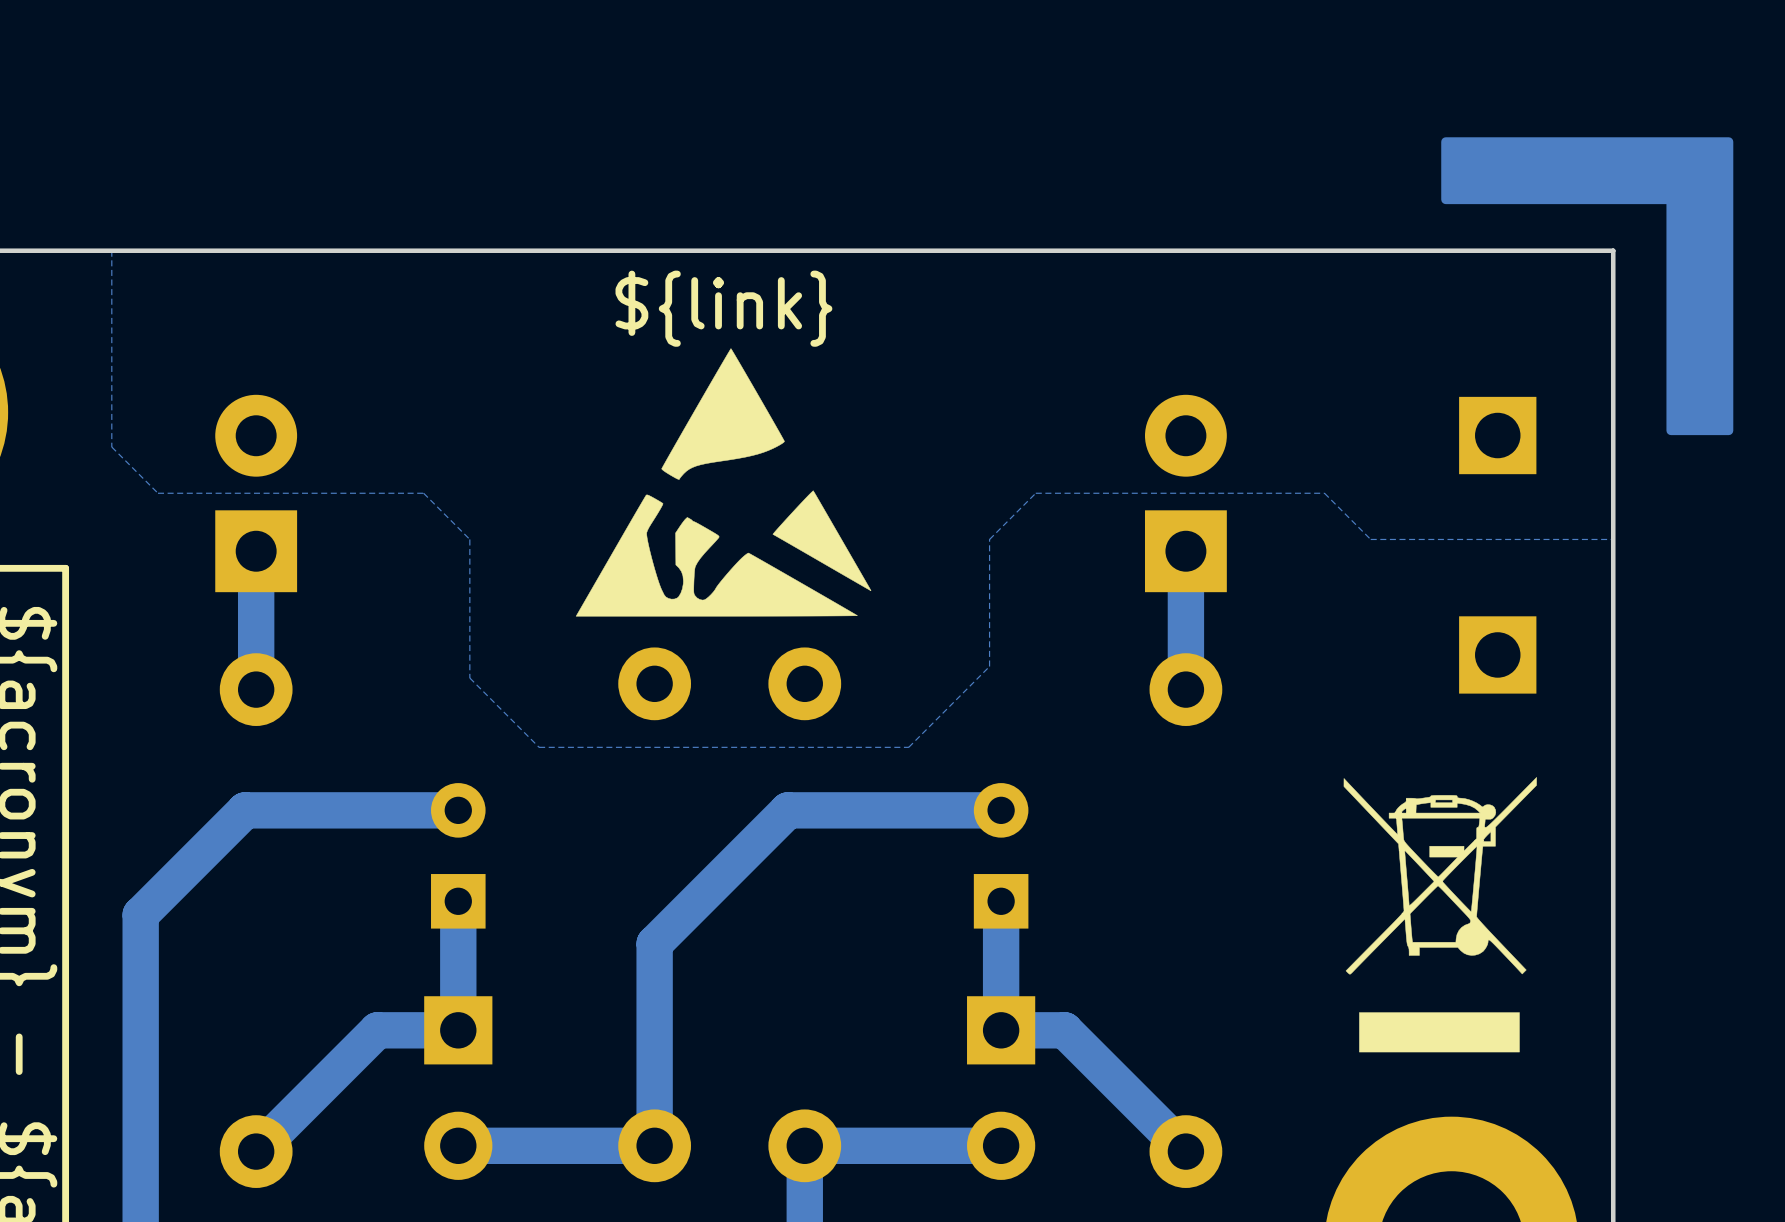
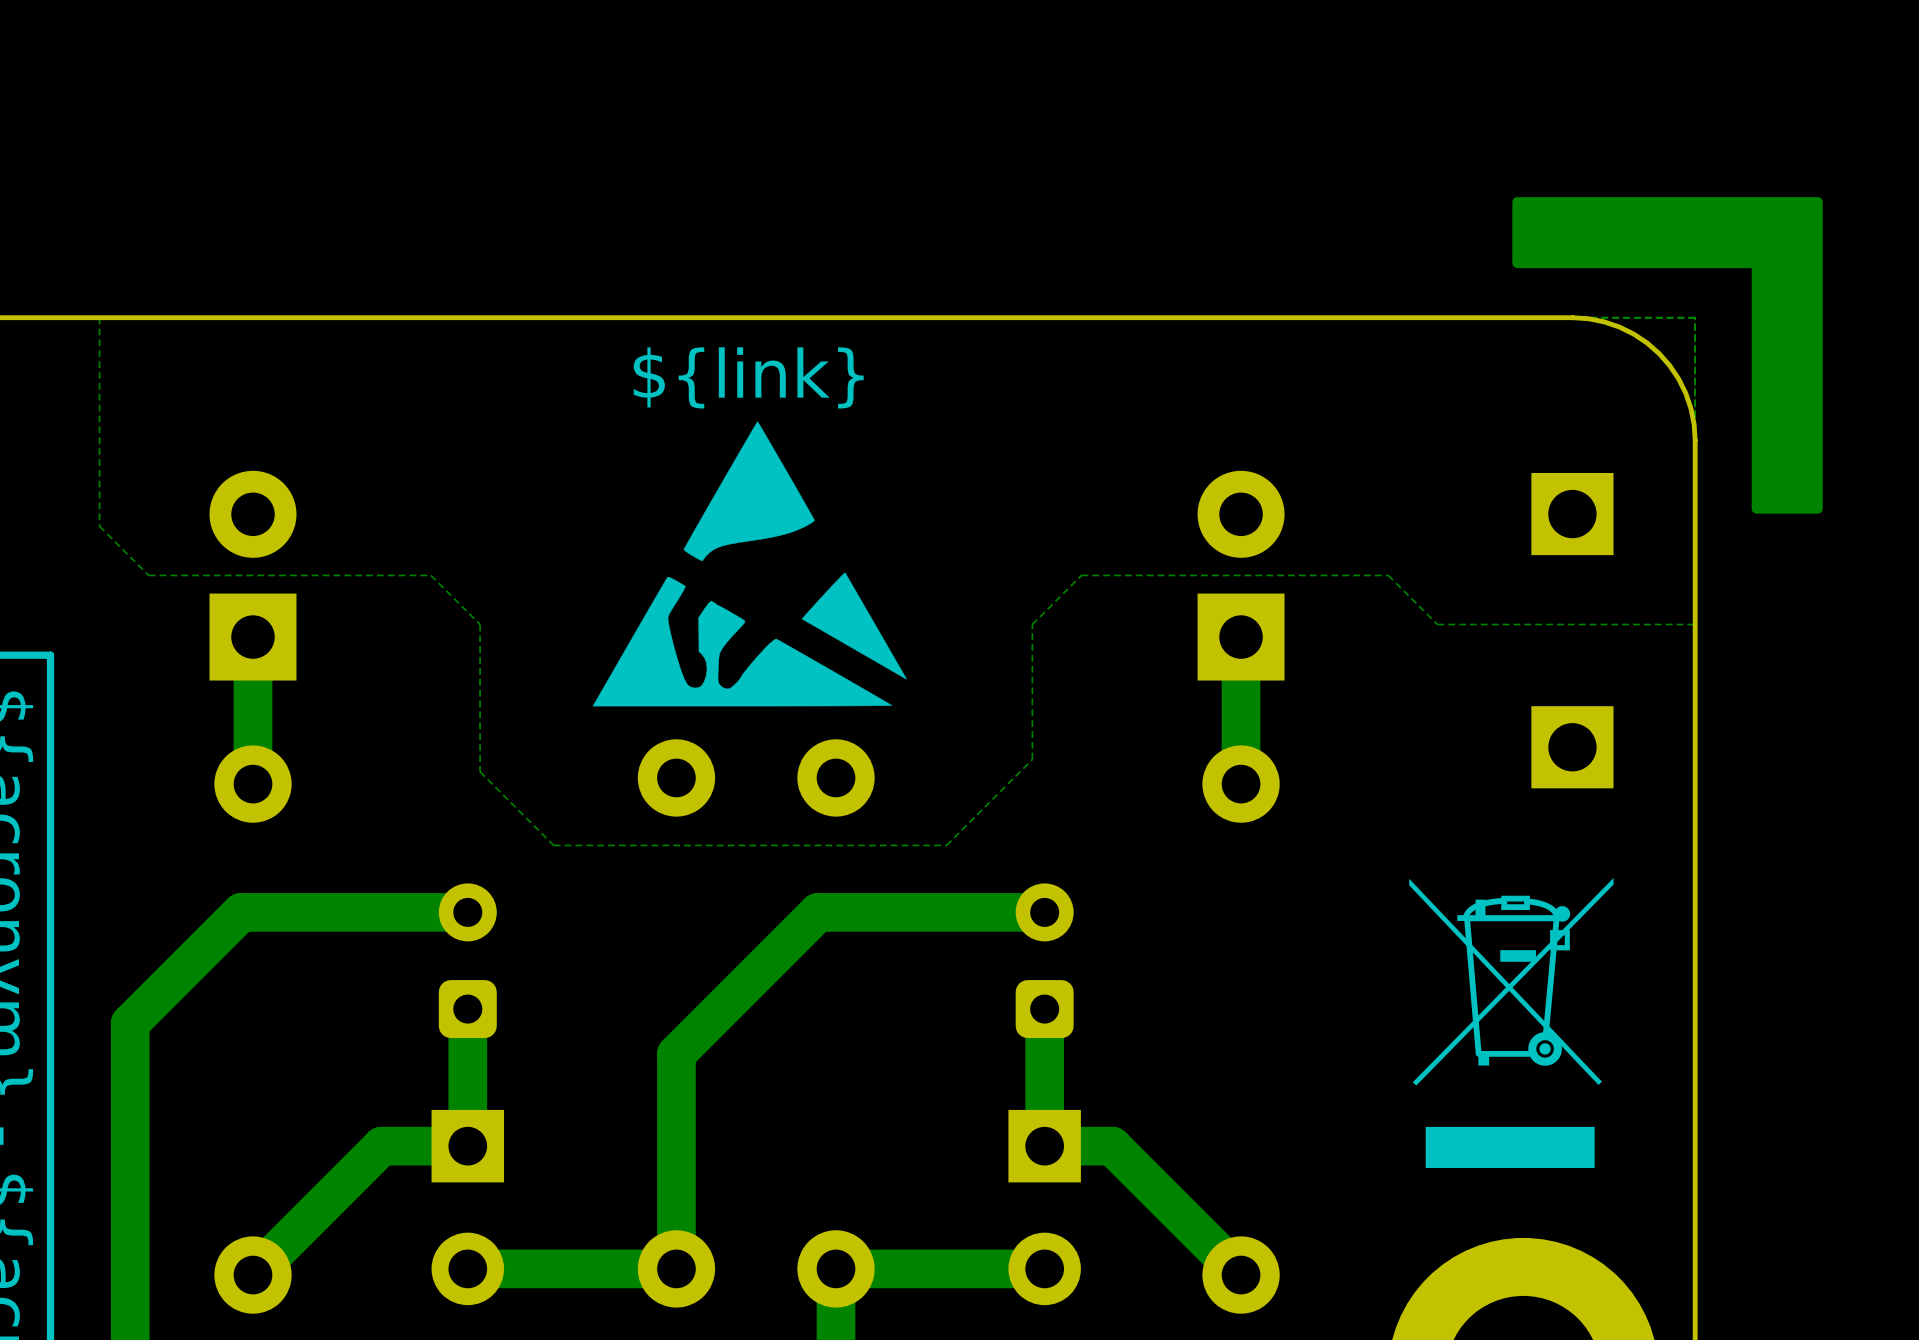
board edge: (1497, 250) (1613, 250) (1613, 366) -> (1572, 317) (1588, 318) (1619, 327) (1633, 334) (1659, 353) (1669, 365) (1685, 393) (1694, 424) (1695, 440)
drawing shape: [1343, 777, 1537, 1053] -> [1409, 877, 1614, 1169]
part footprint: [431, 783, 486, 929] -> [438, 883, 497, 1039]
part footprint: [973, 783, 1029, 929] -> [1015, 883, 1074, 1039]

